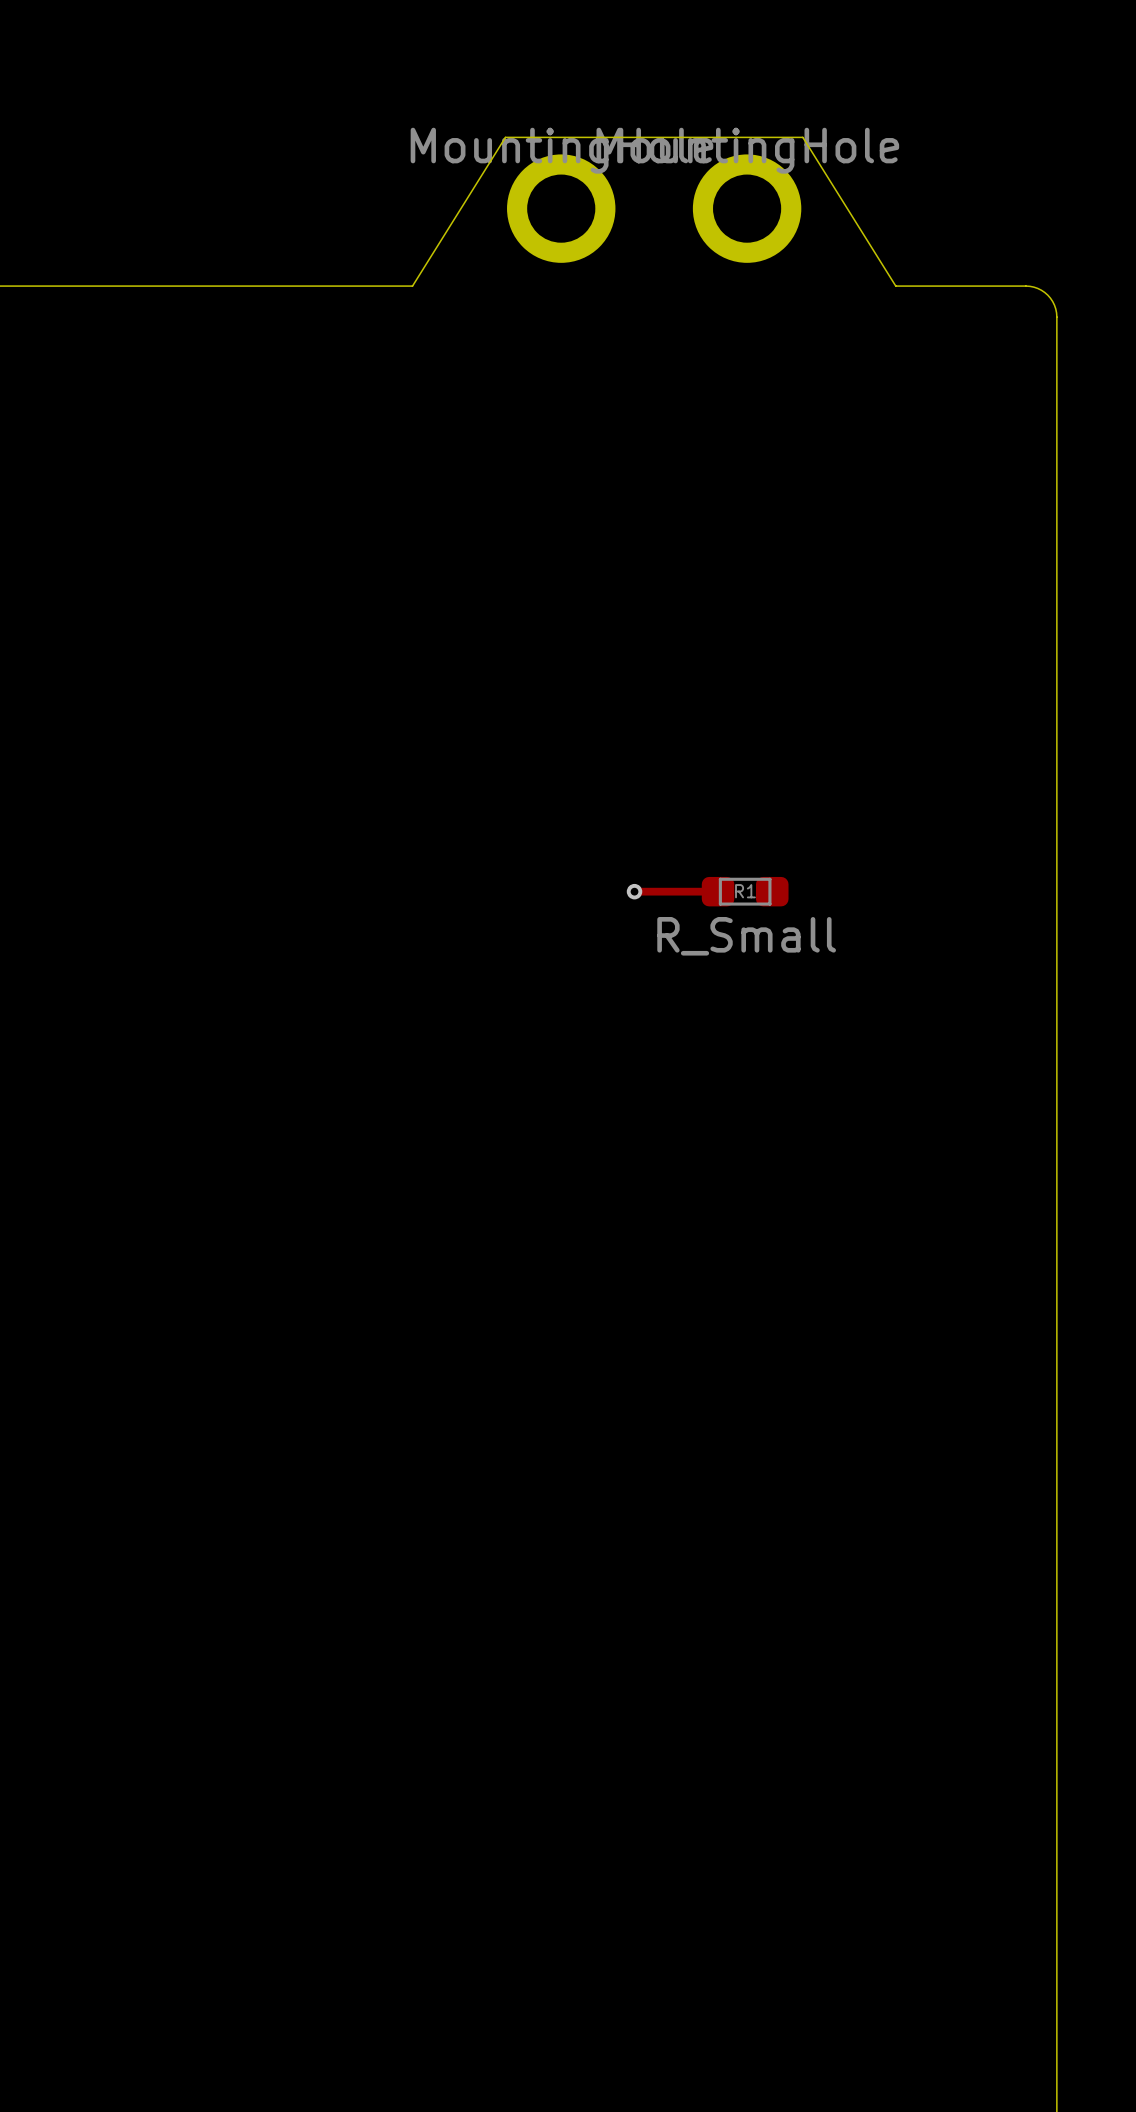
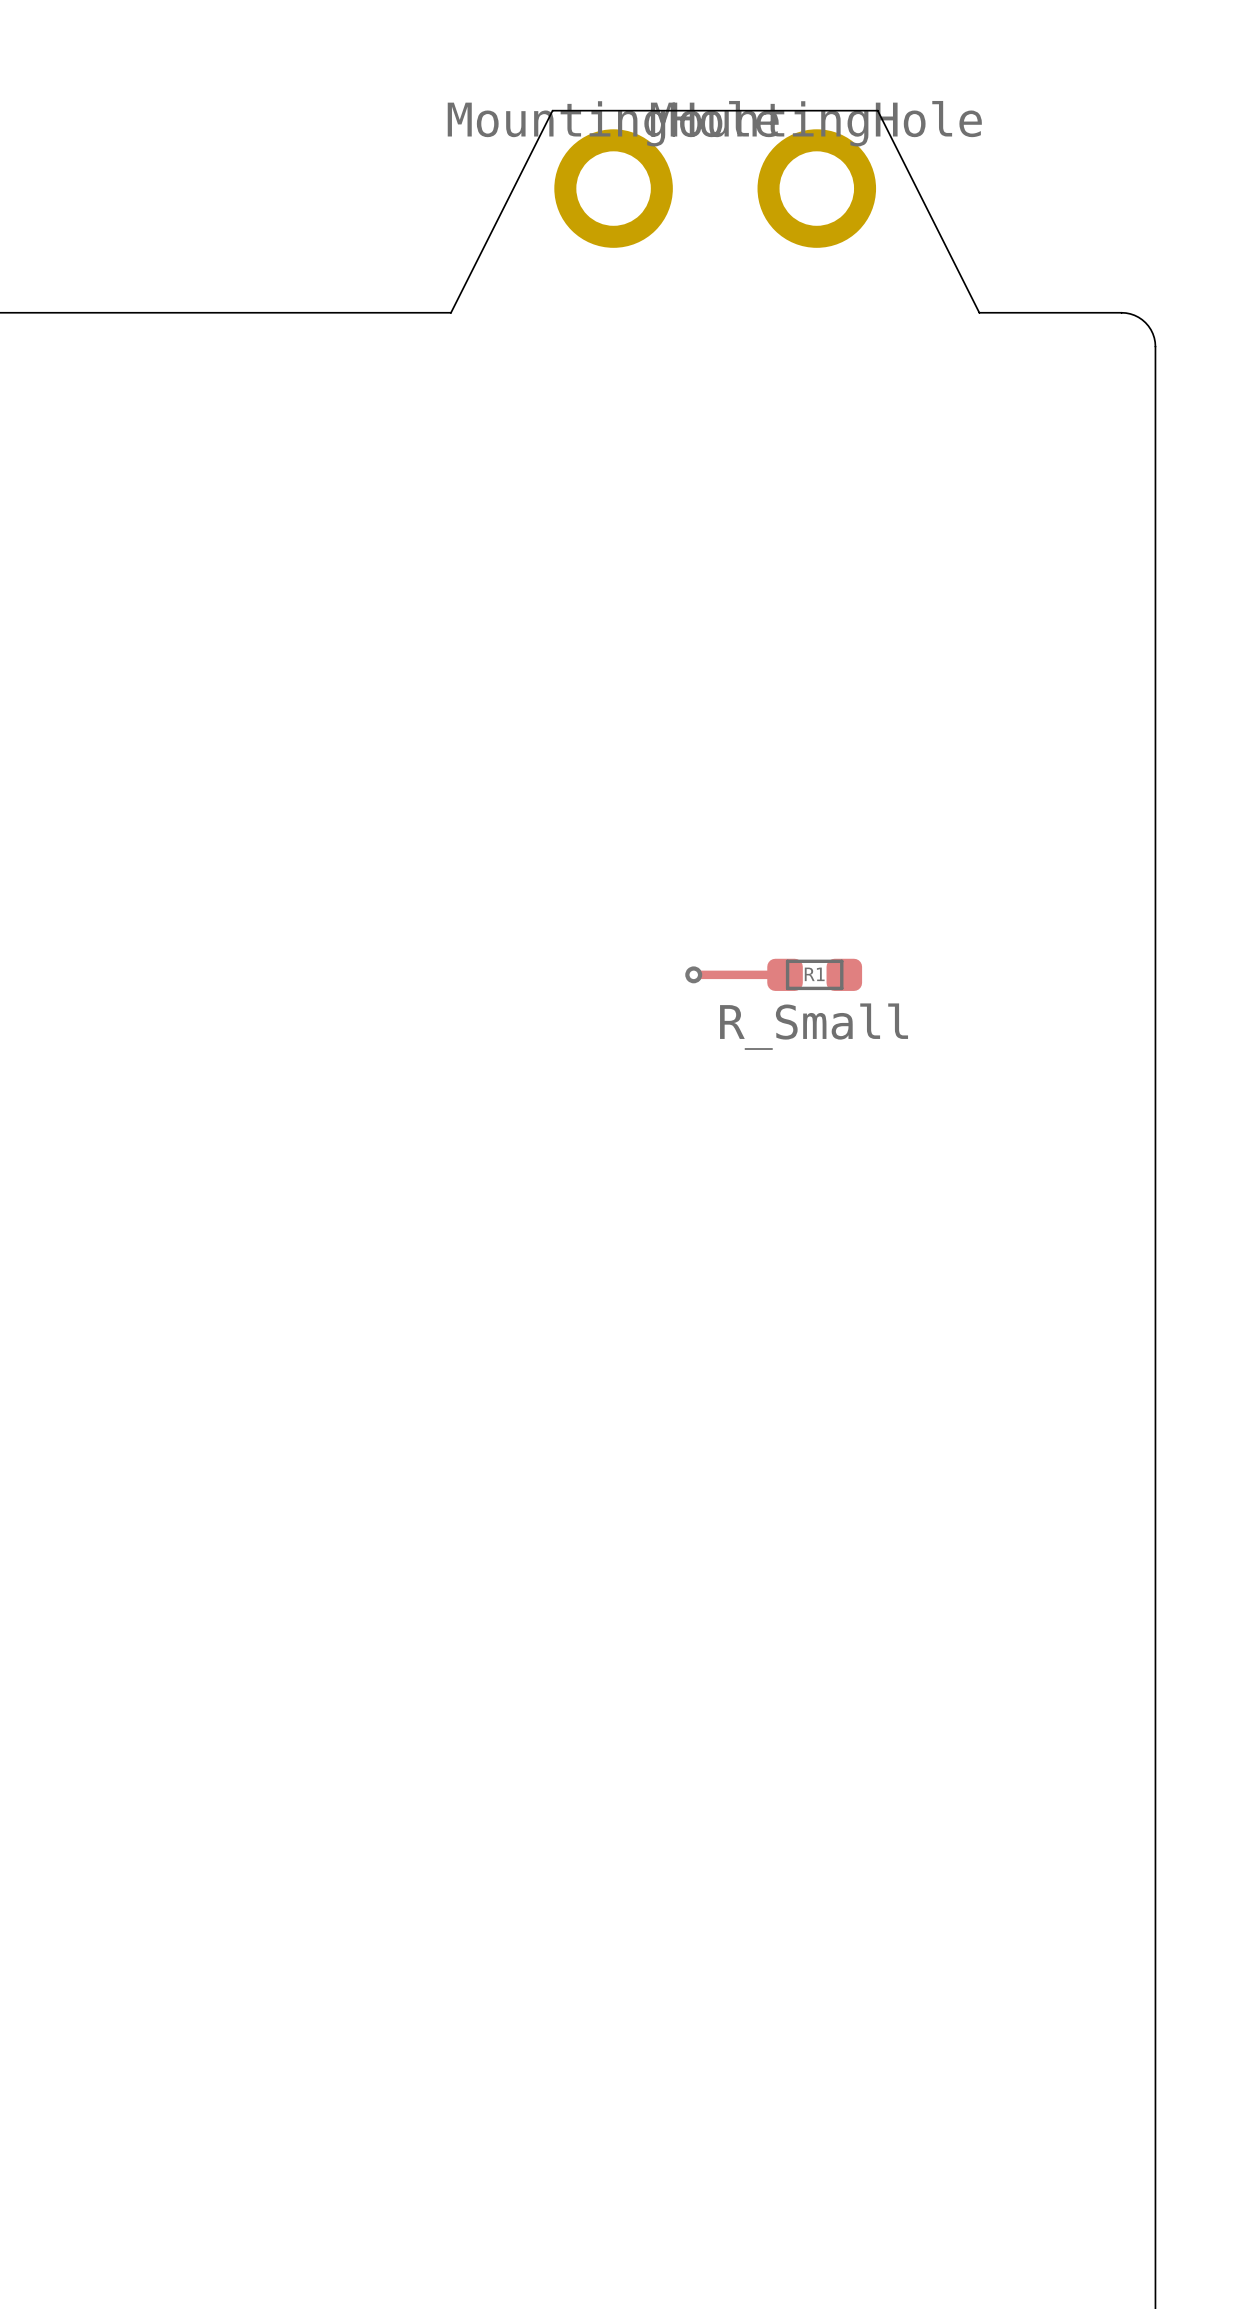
part position: (561, 208) -> (613, 188)
part position: (747, 208) -> (816, 188)
board edge: (412, 286) (505, 137) (802, 137) (895, 286) -> (451, 312) (552, 110) (877, 110) (979, 312)

